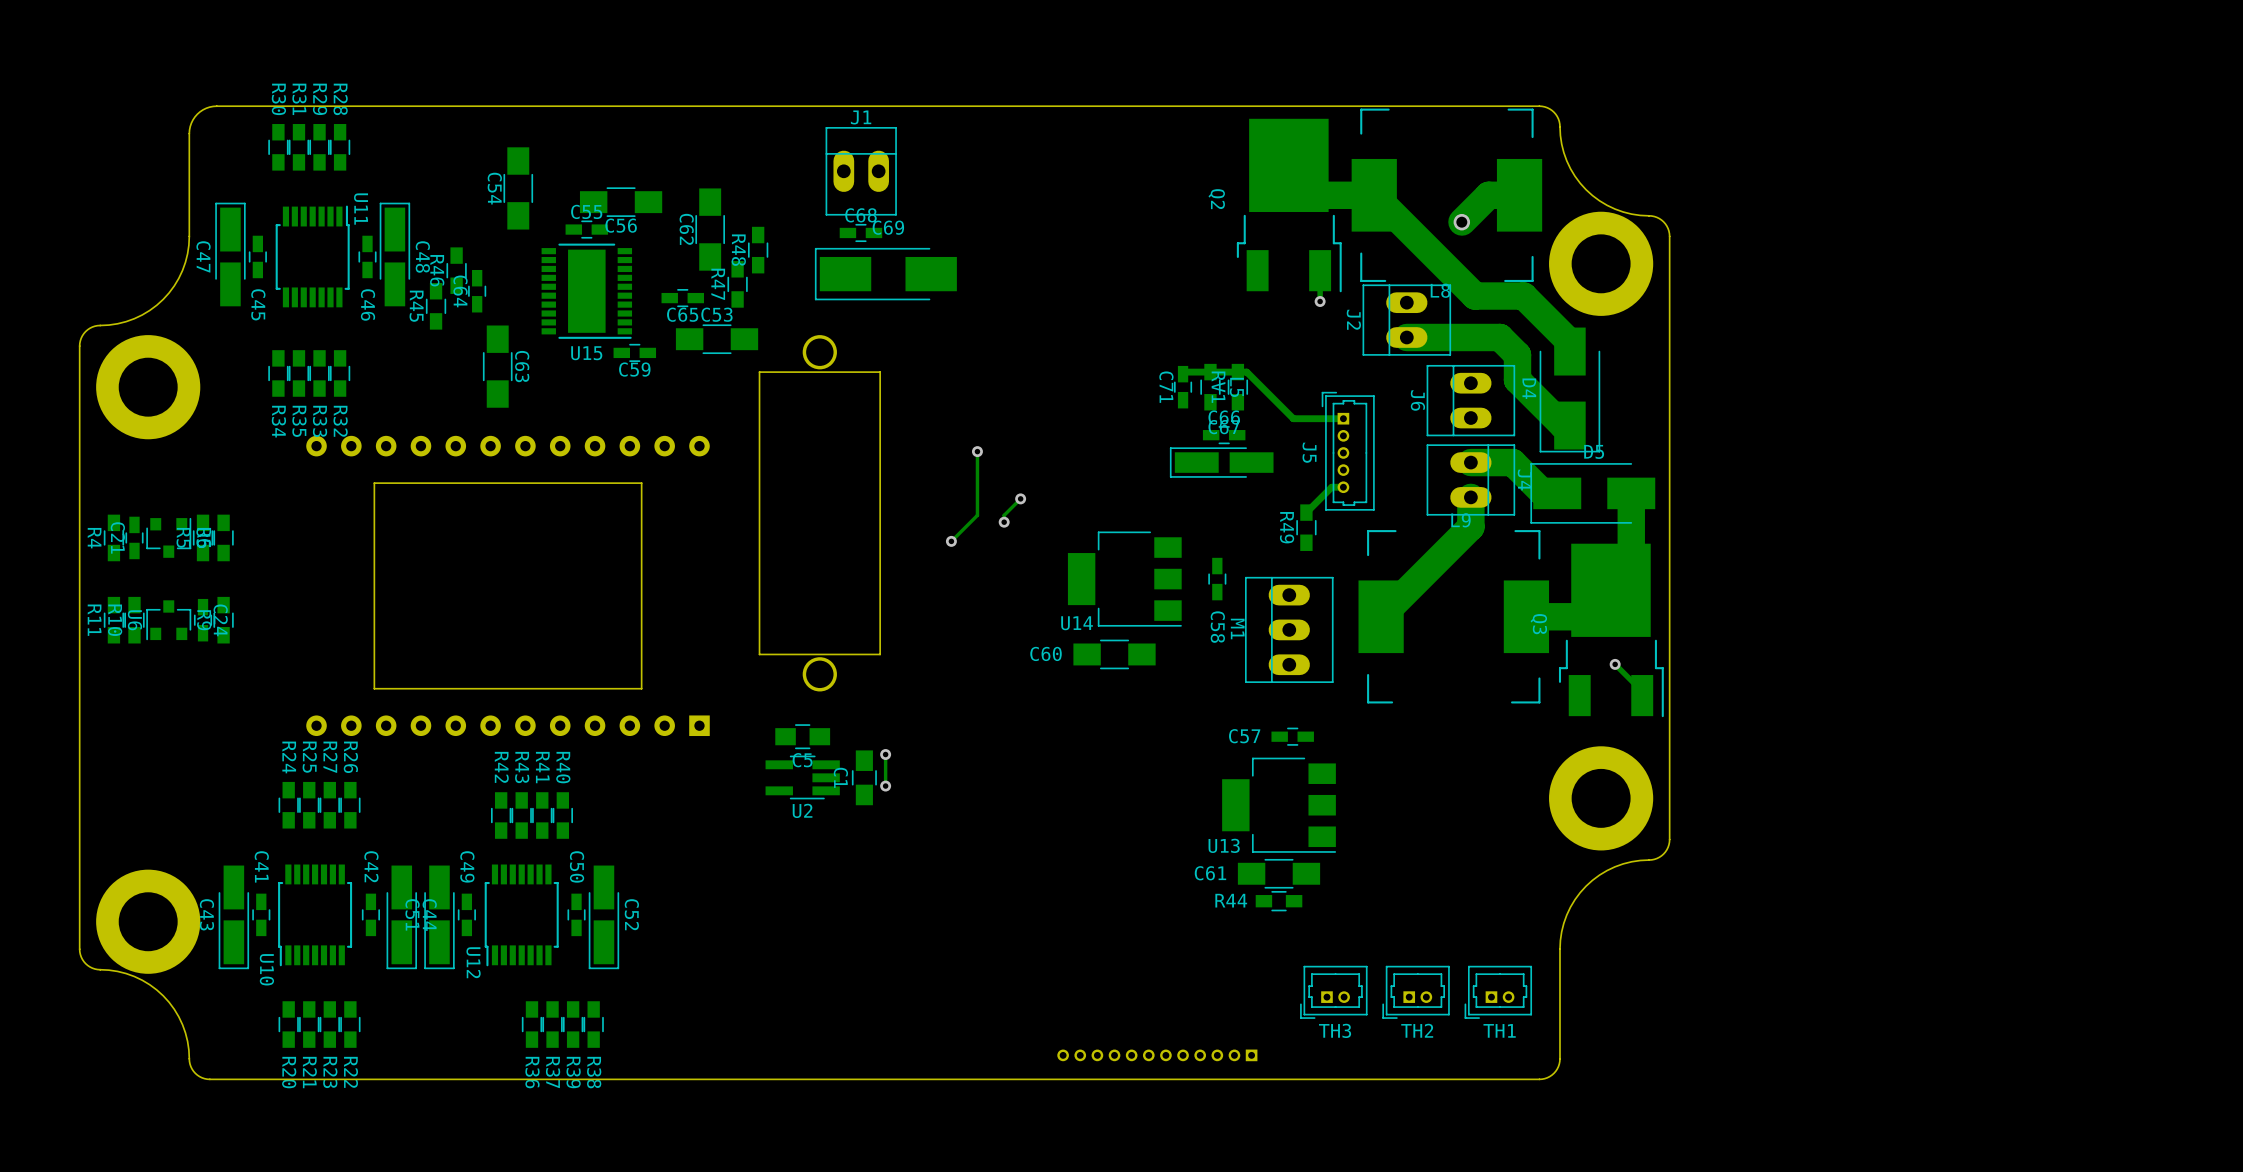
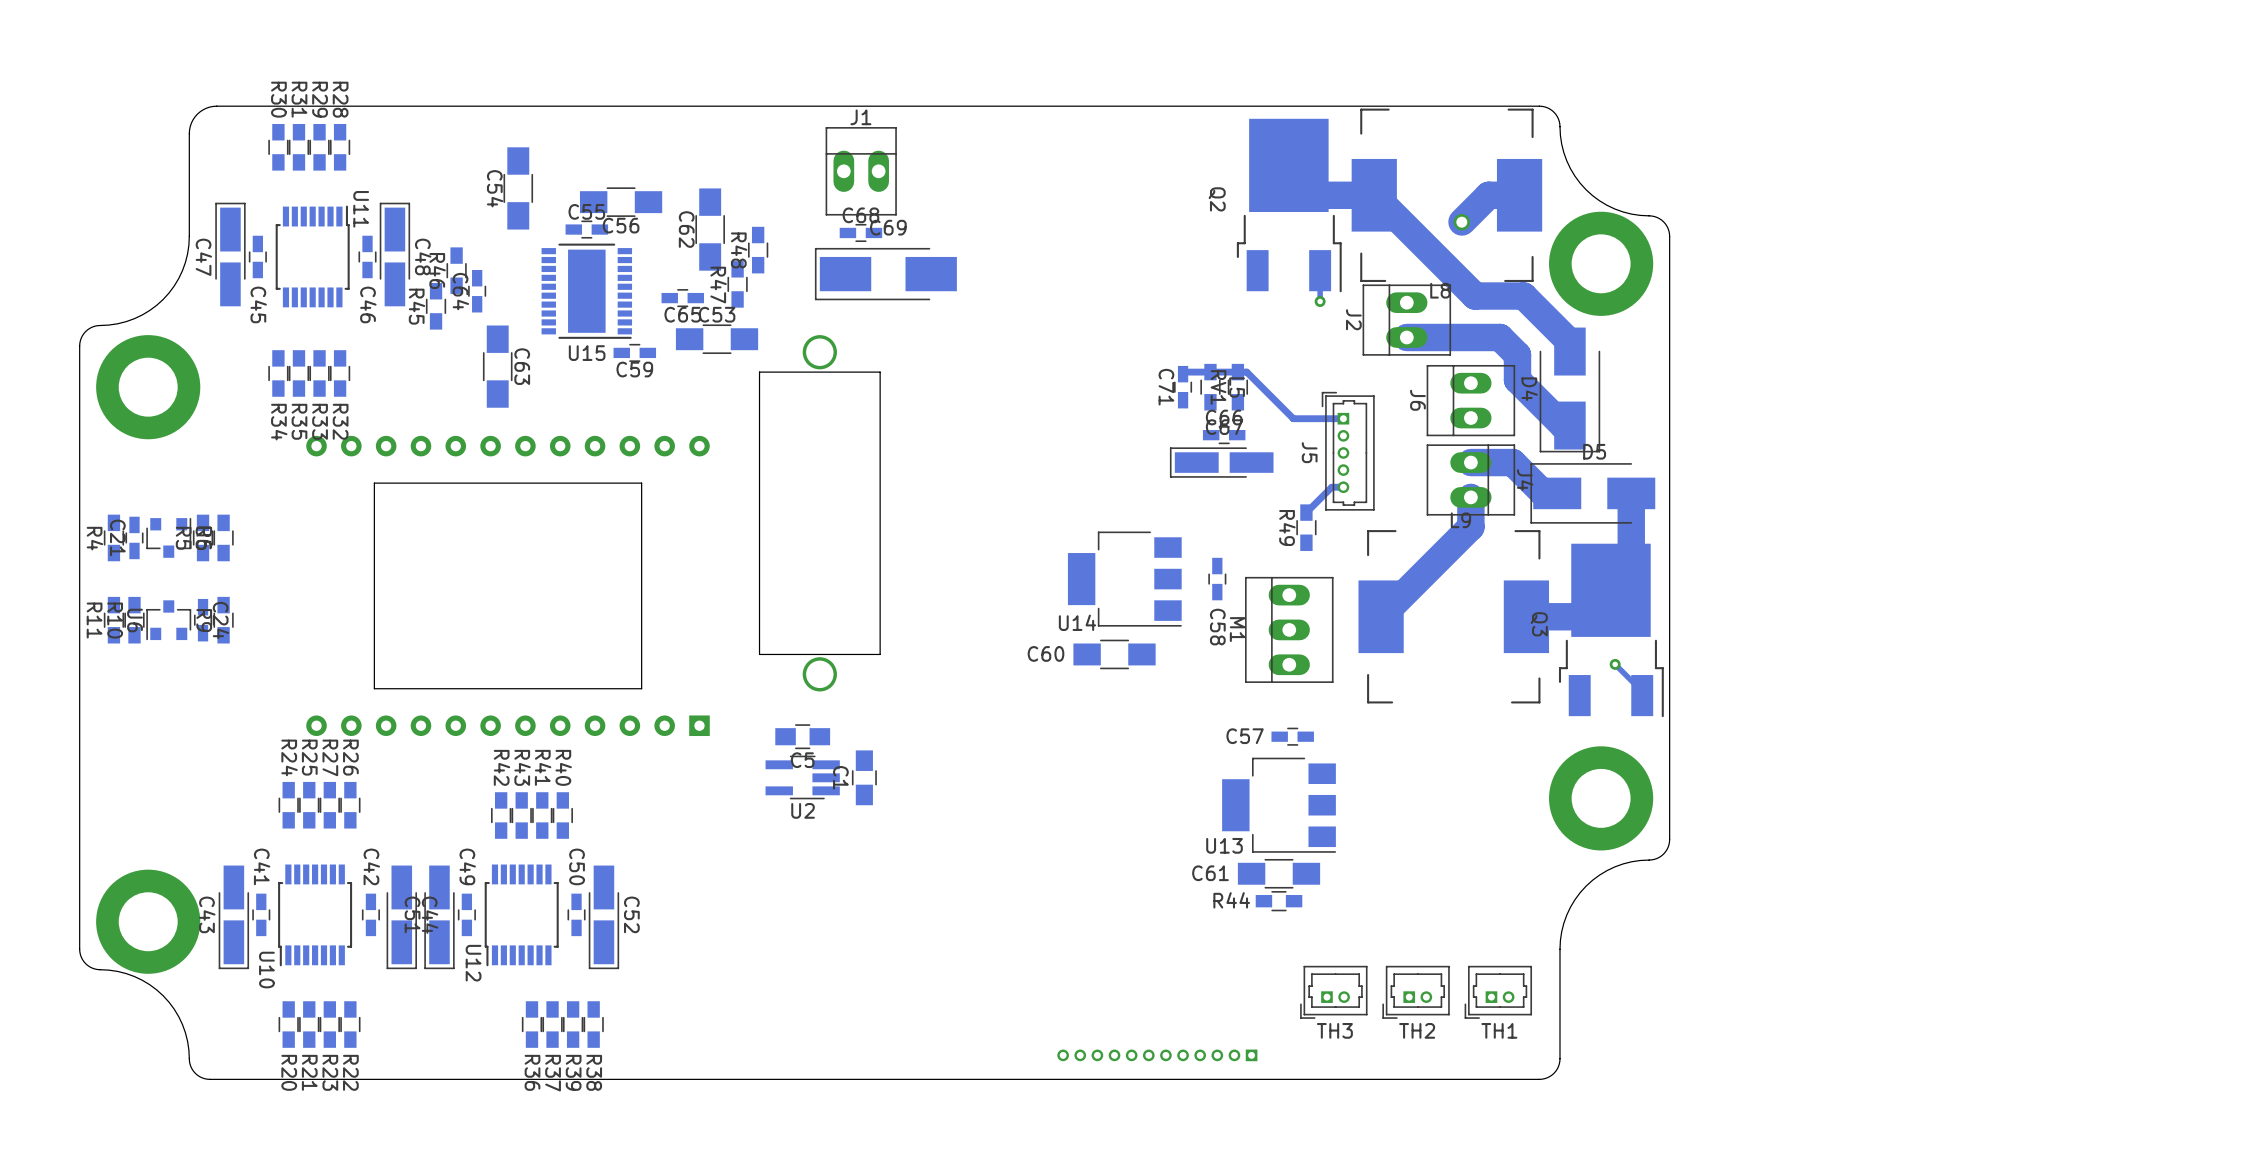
track: (977, 451) (977, 515) (951, 541) -> none
via: (977, 451) -> none
track: (1020, 498) (1004, 515) (1004, 522) -> none
via: (1020, 498) -> none
via: (1004, 522) -> none
via: (951, 541) -> none
track: (885, 754) (885, 786) -> none
via: (885, 754) -> none
via: (885, 786) -> none

